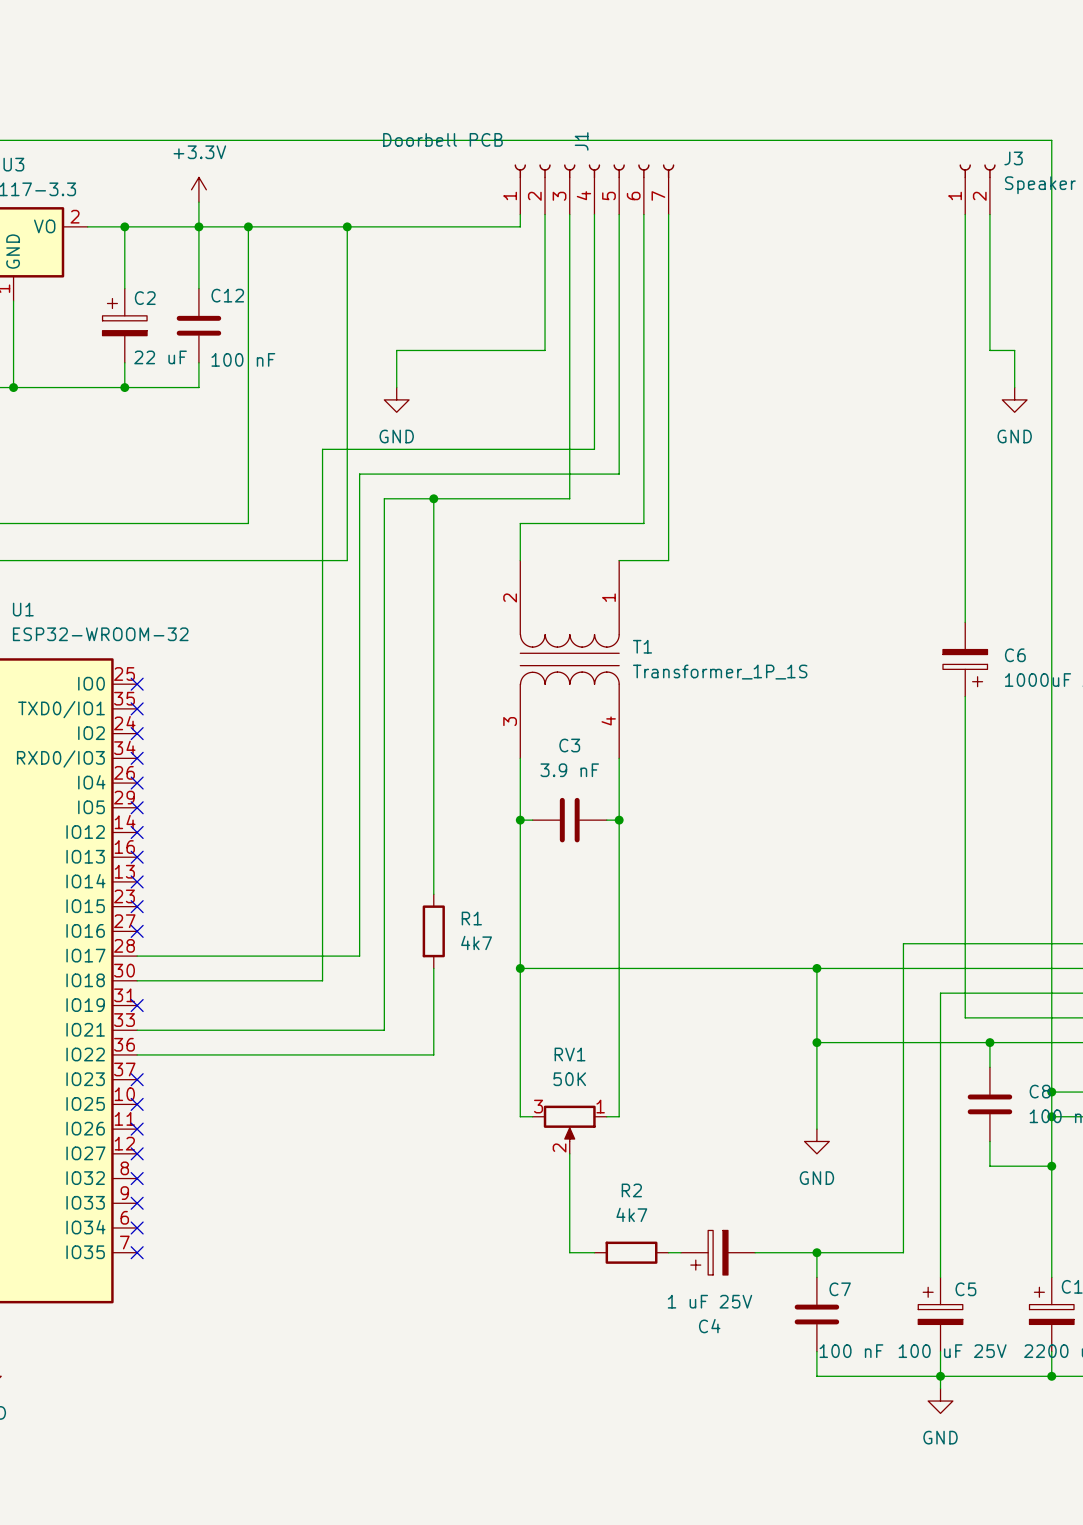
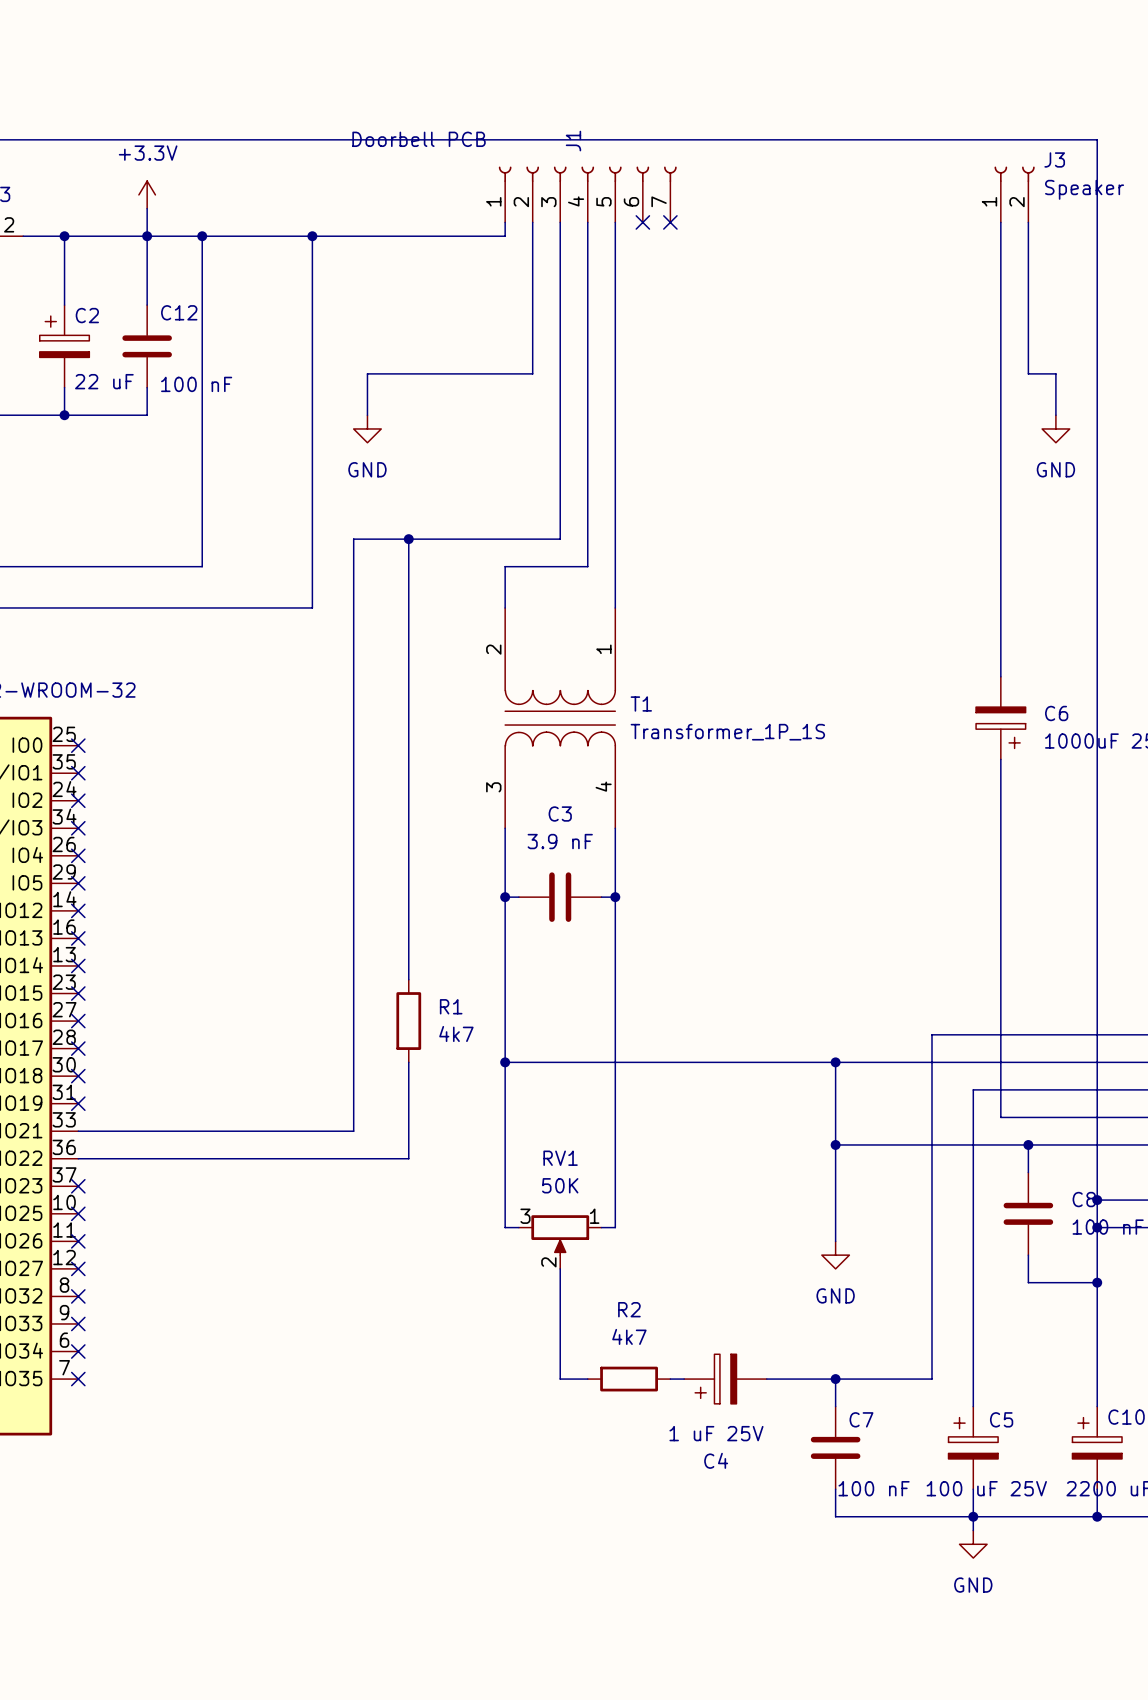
wire: (643, 214) (643, 523) (594, 523) -> (587, 484) (587, 566)
no-connect mark: none -> (642, 222)
wire: (668, 214) (668, 560) (619, 560) -> (615, 511) (615, 607)
no-connect mark: none -> (670, 222)
wire: (594, 449) (322, 449) (322, 980) (137, 980) -> none
wire: (619, 474) (359, 474) (359, 956) (137, 956) -> none
no-connect mark: none -> (78, 1048)
no-connect mark: none -> (78, 1076)

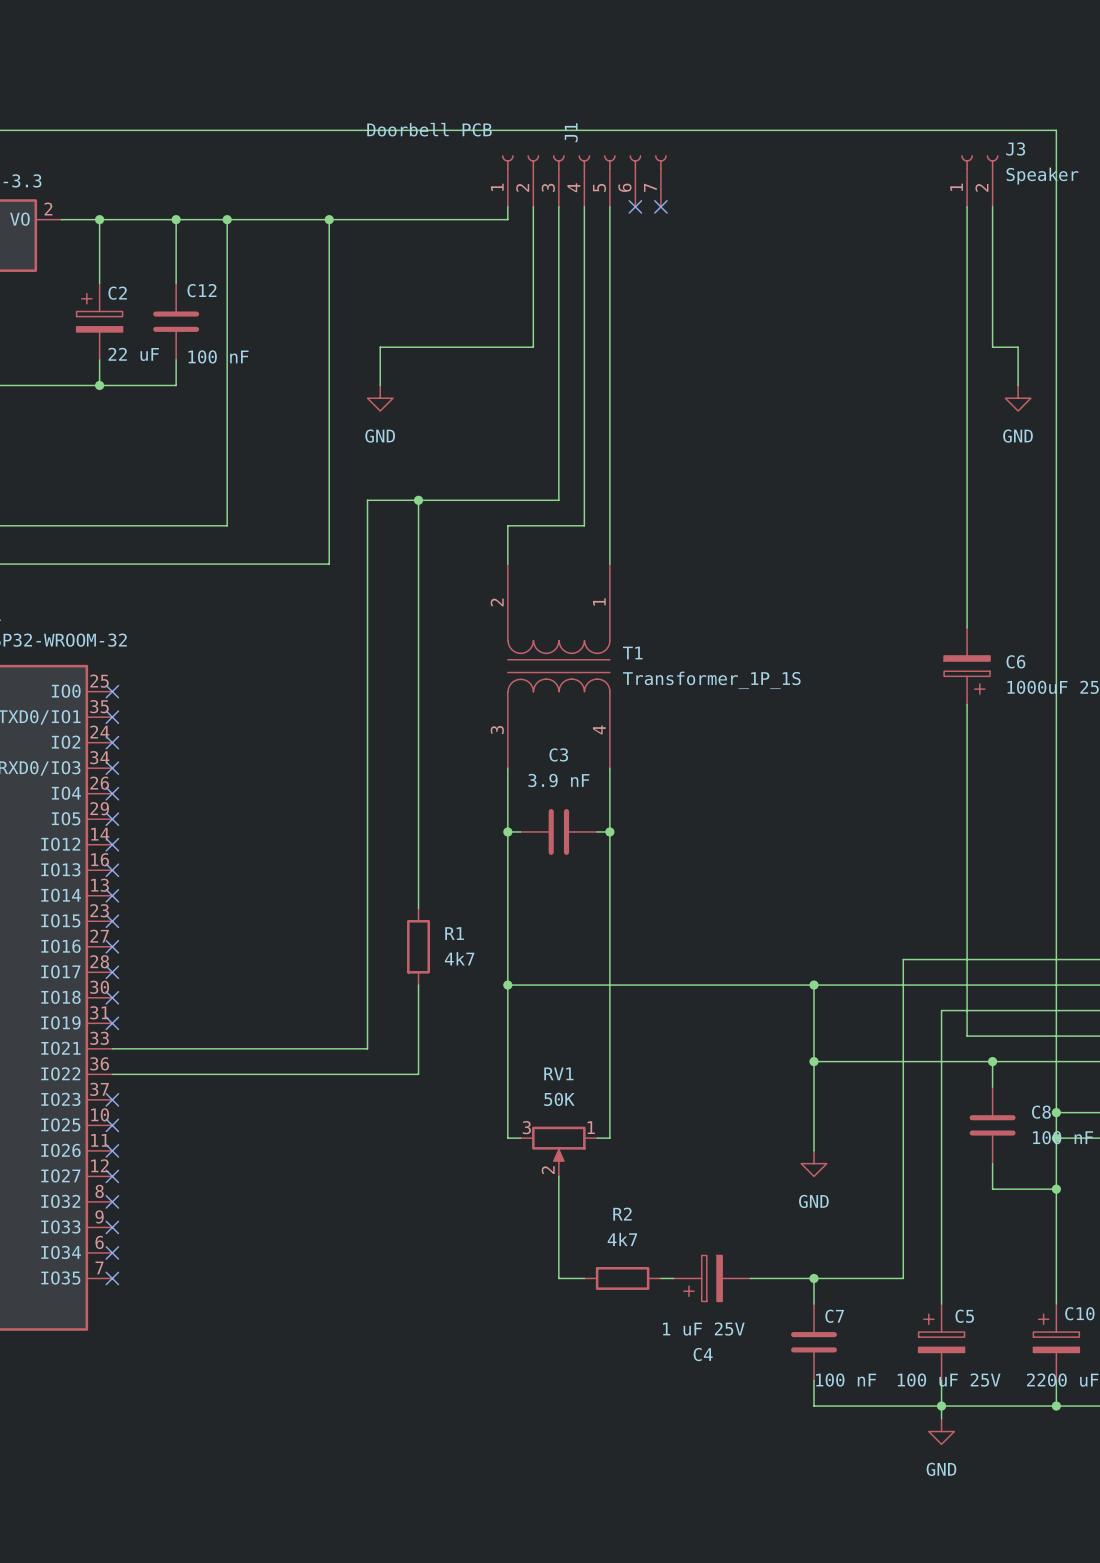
power symbol: +3.3V (147, 194) -> none
wire: (147, 208) (147, 236) -> none

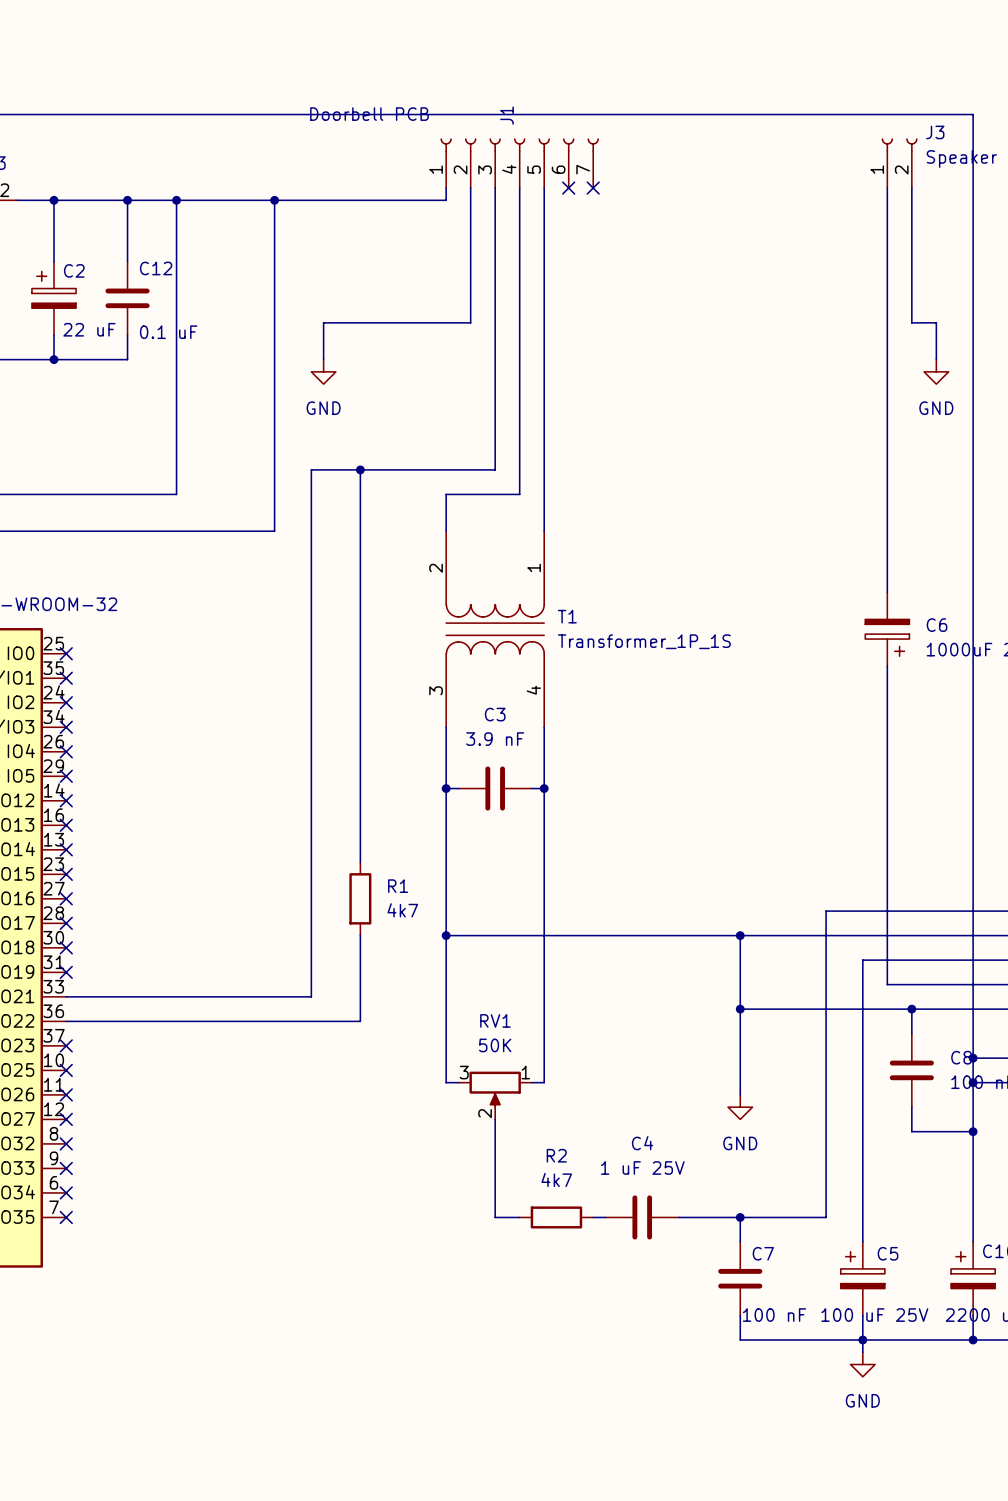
C12 value: 100 nF (218, 356) -> 0.1 uF (168, 332)
C4 symbol: [673, 1255, 751, 1302] -> [605, 1195, 680, 1240]
C4 value position: 1 uF 25V (703, 1329) -> 1 uF 25V (642, 1167)
C4 name position: C4 (703, 1354) -> C4 (642, 1143)

